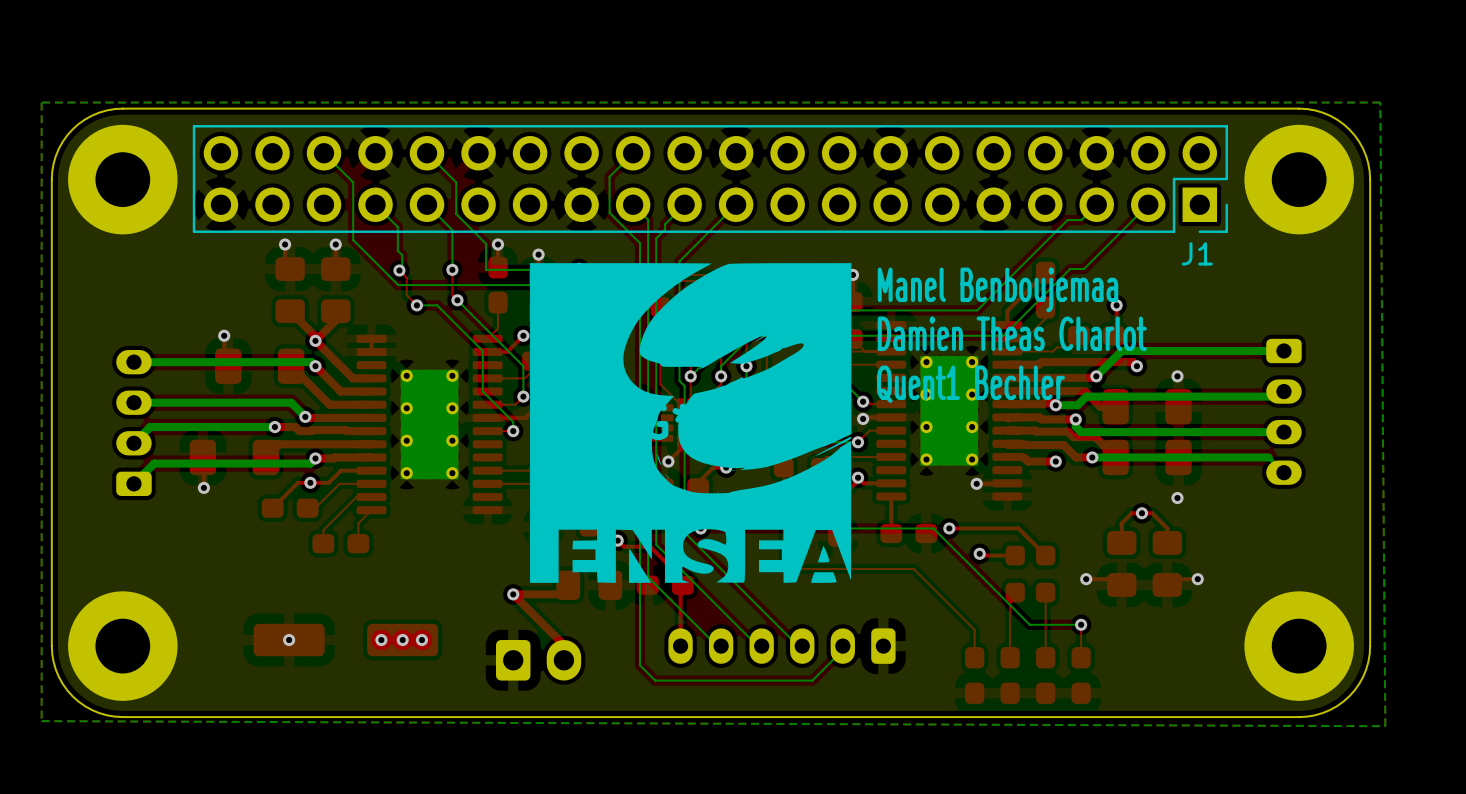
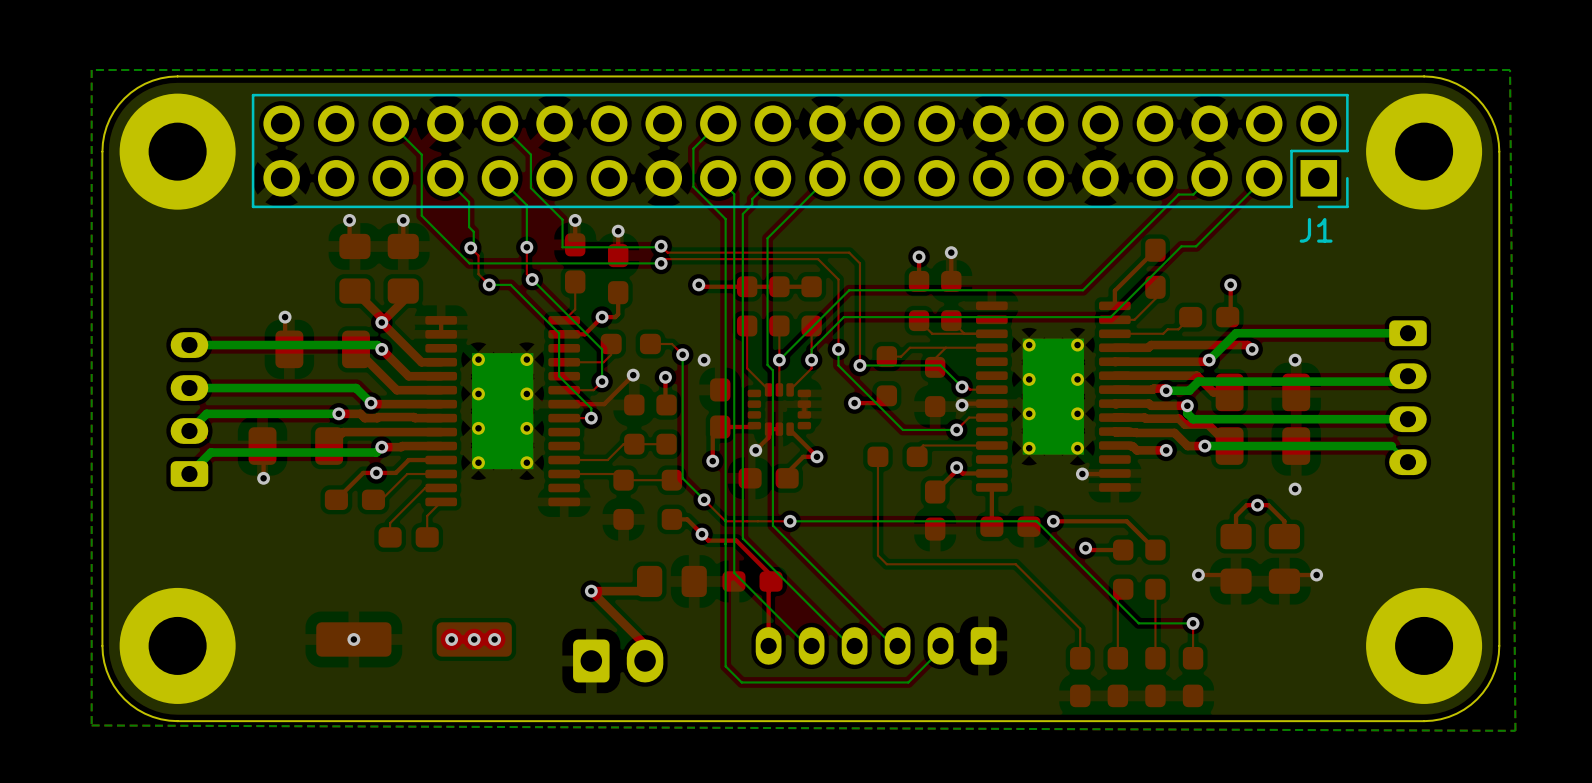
text: Manel Benboujemaa (997, 289) -> none
text: Damien Theas Charlot (1012, 333) -> none
text: Quent1 Bechler (970, 384) -> none
part: (690, 423) -> none

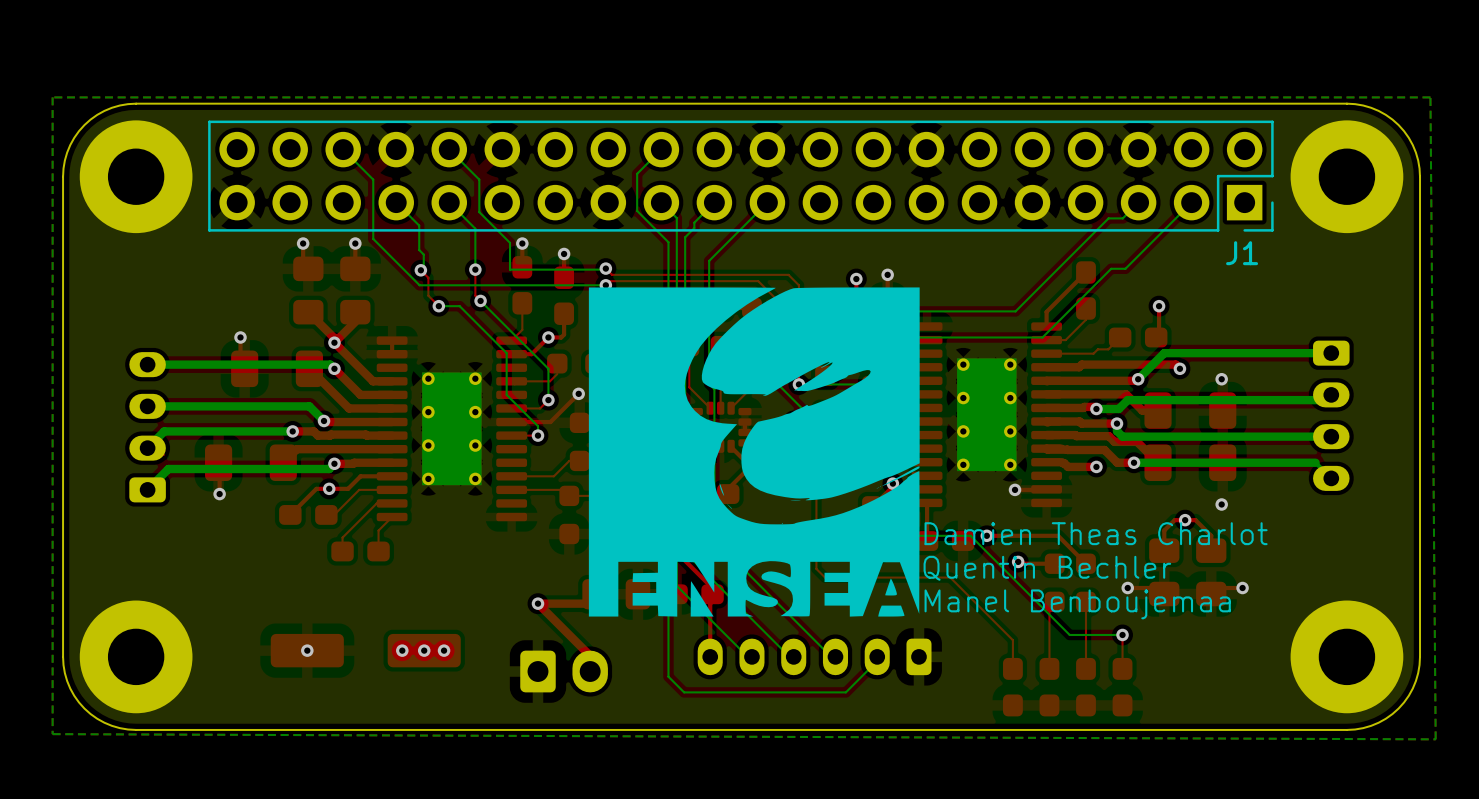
drawing: none -> [588, 287, 920, 617]
text: none -> Damien Theas Charlot (1096, 533)
text: none -> Quentin Bechler (1047, 568)
text: none -> Manel Benboujemaa (1077, 604)

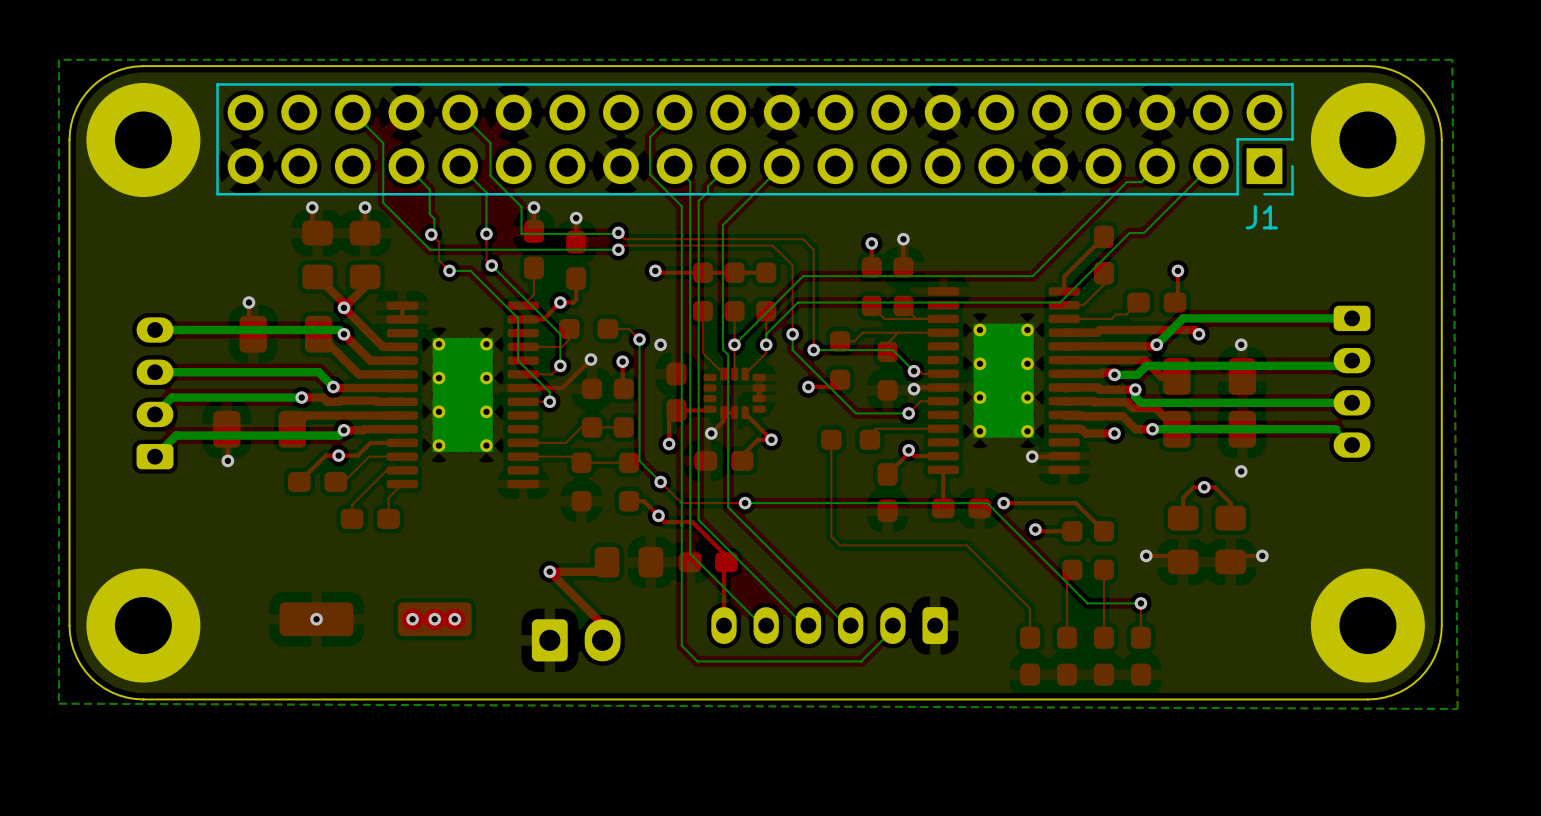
drawing: [588, 287, 920, 617] -> none
text: Damien Theas Charlot (1096, 533) -> none
text: Quentin Bechler (1047, 568) -> none
text: Manel Benboujemaa (1077, 604) -> none

